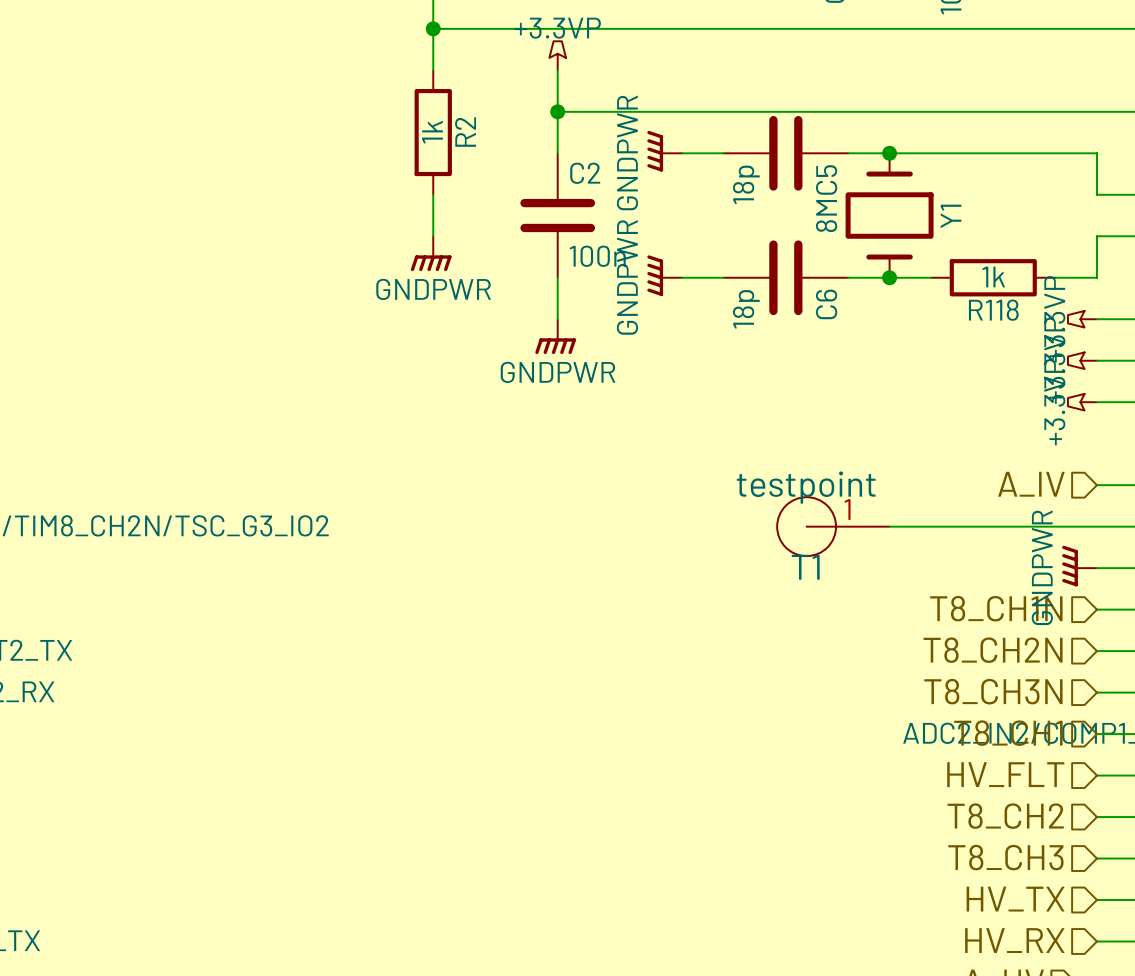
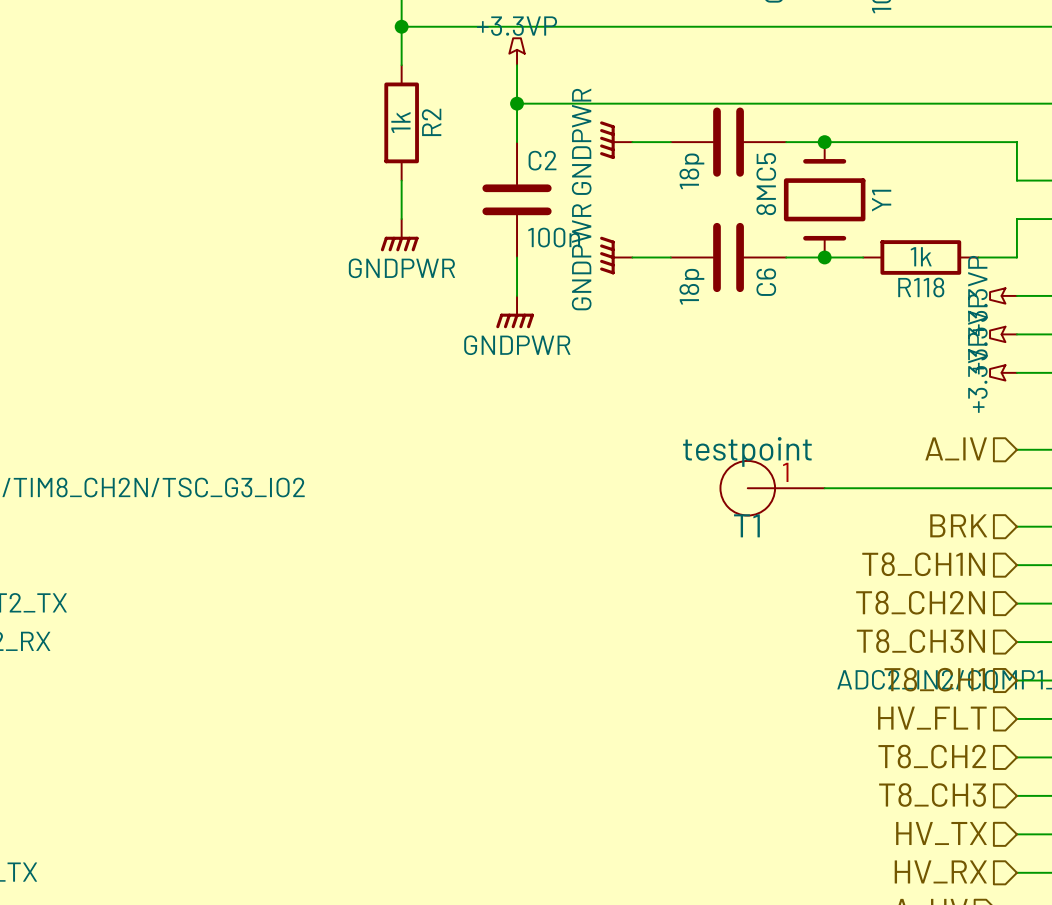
power symbol: GNDPWR (1079, 566) -> none
hierarchical label: none -> BRK (958, 525)

